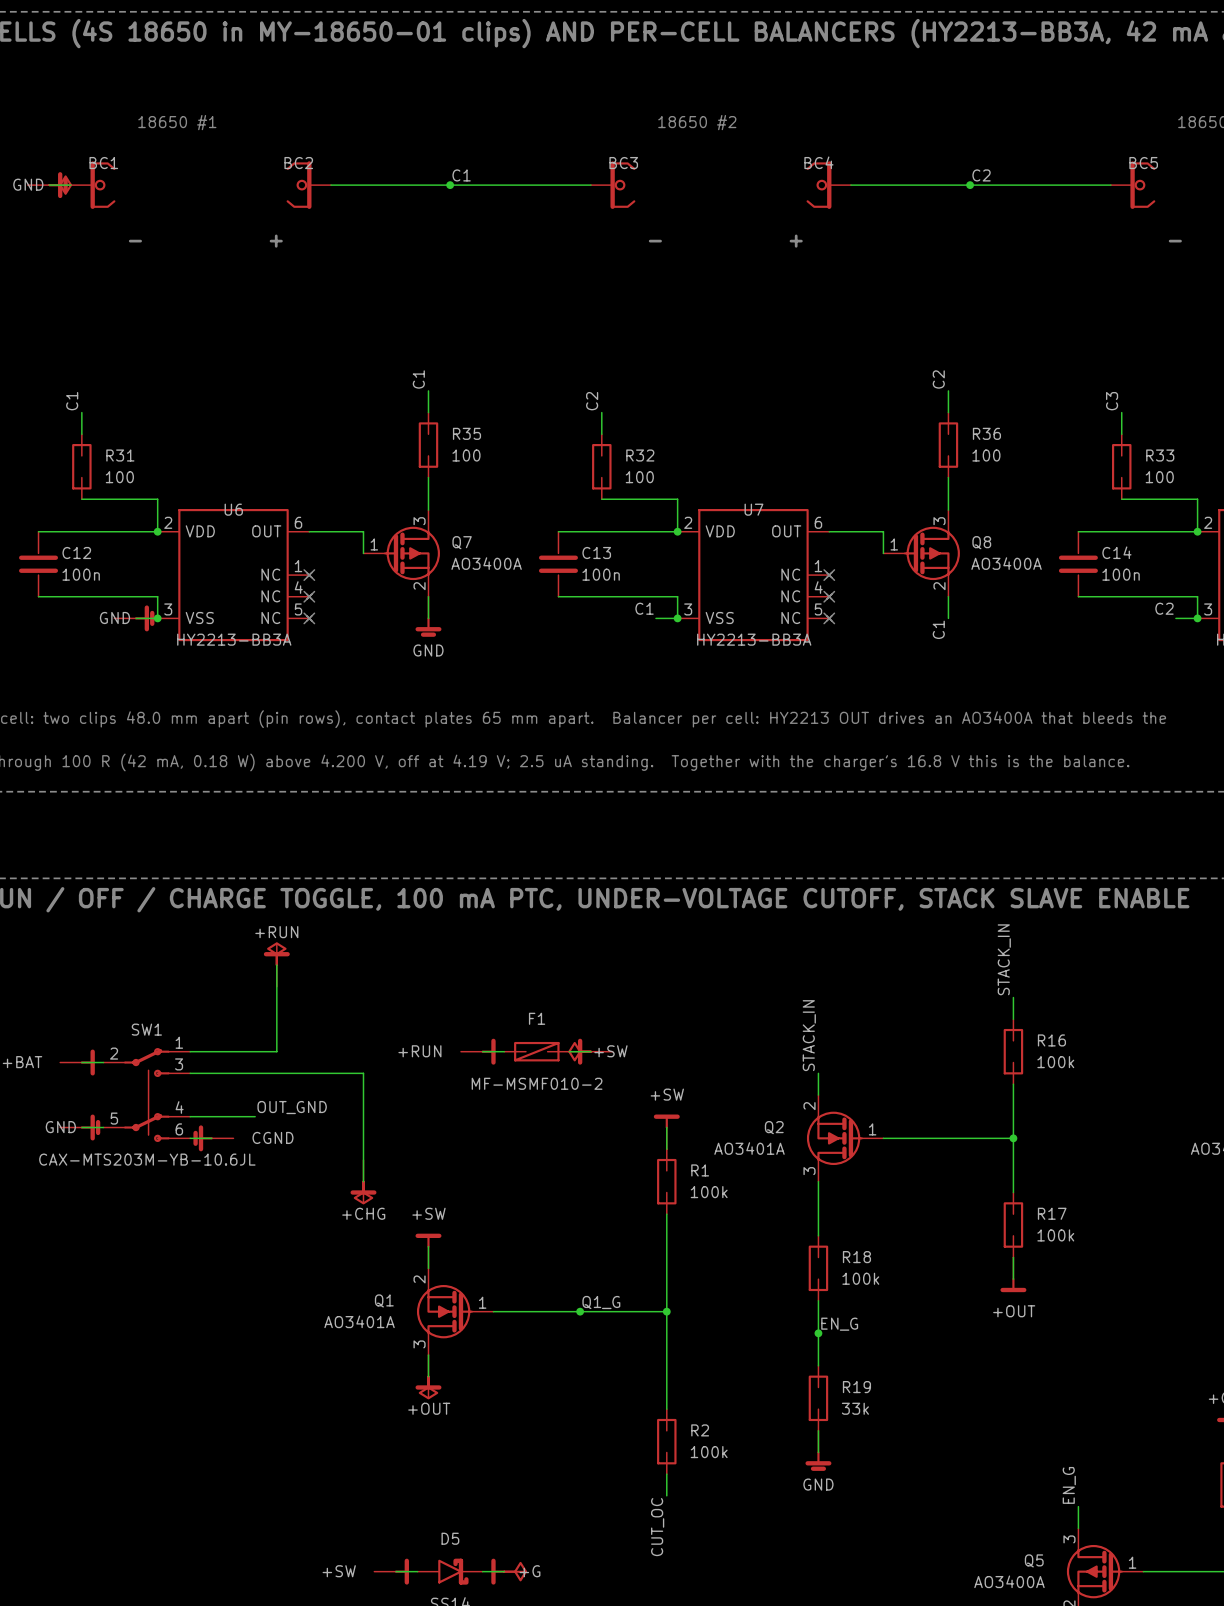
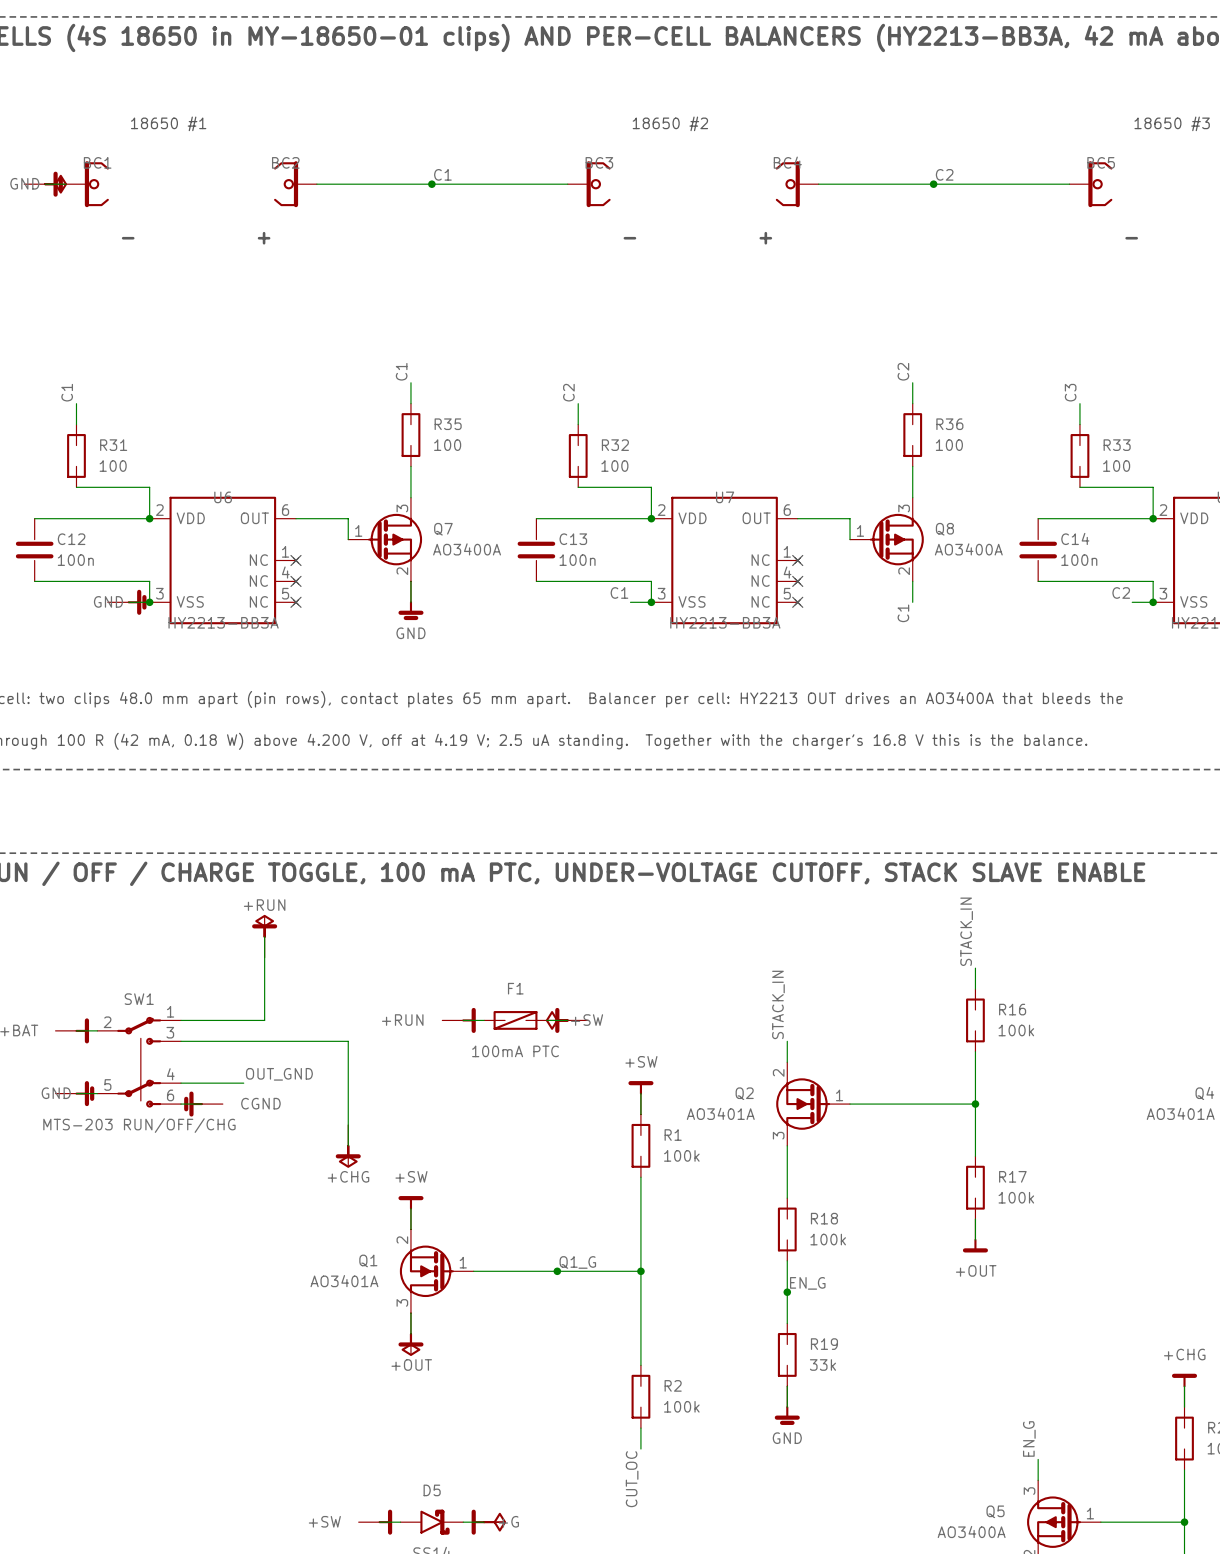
F1 value: MF-MSMF010-2 (537, 1083) -> 100mA PTC (515, 1051)
SW1 value: CAX-MTS203M-YB-10.6JL (147, 1159) -> MTS-203 RUN/OFF/CHG (139, 1125)

